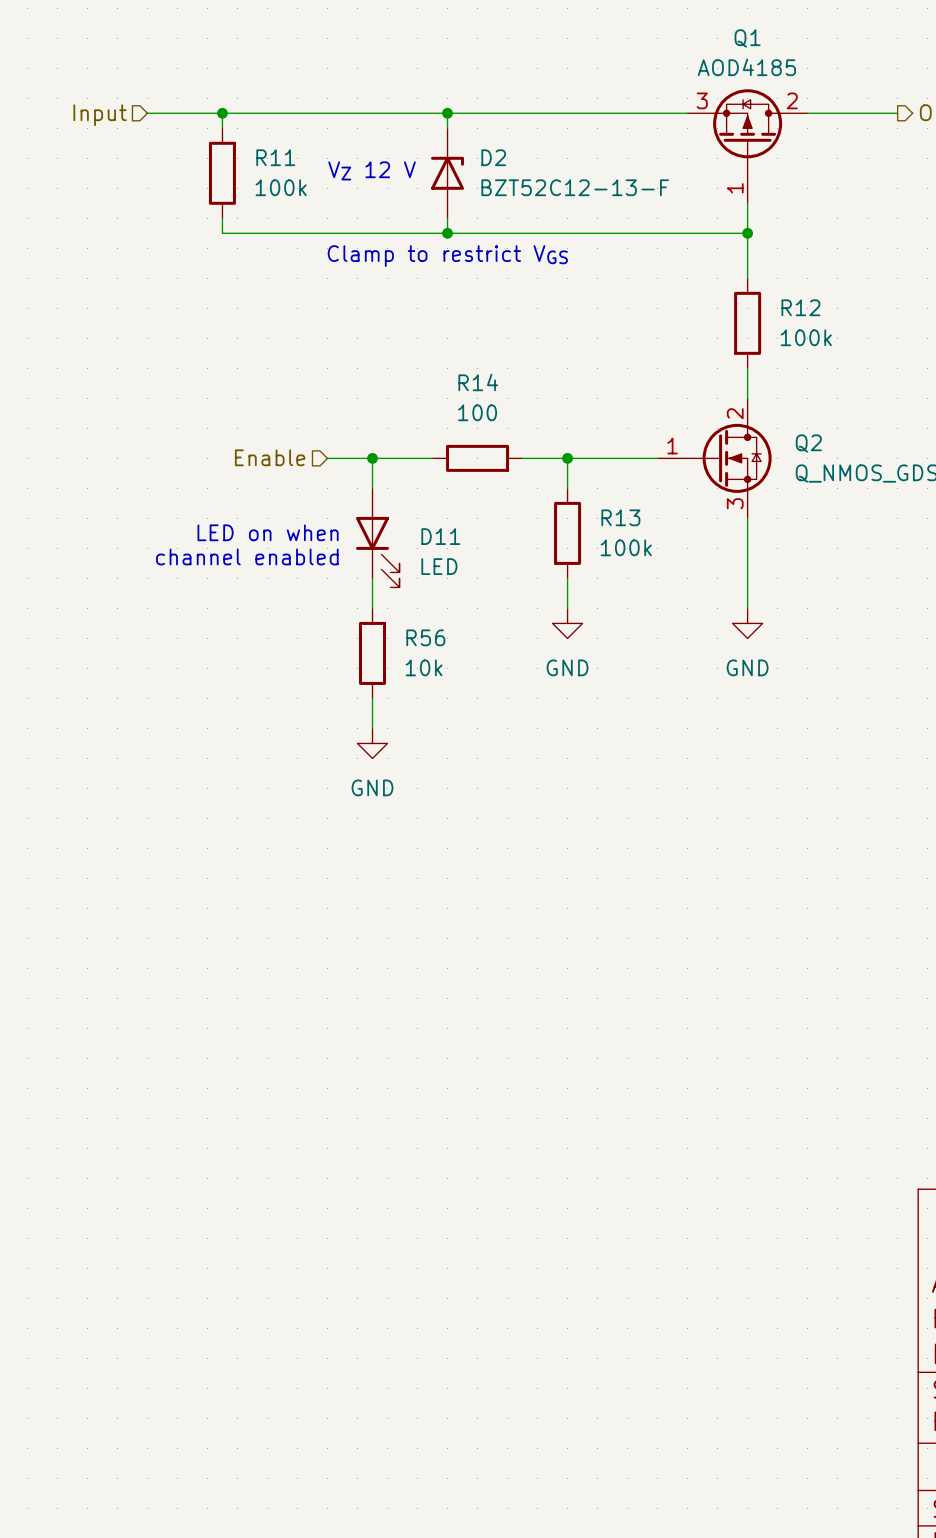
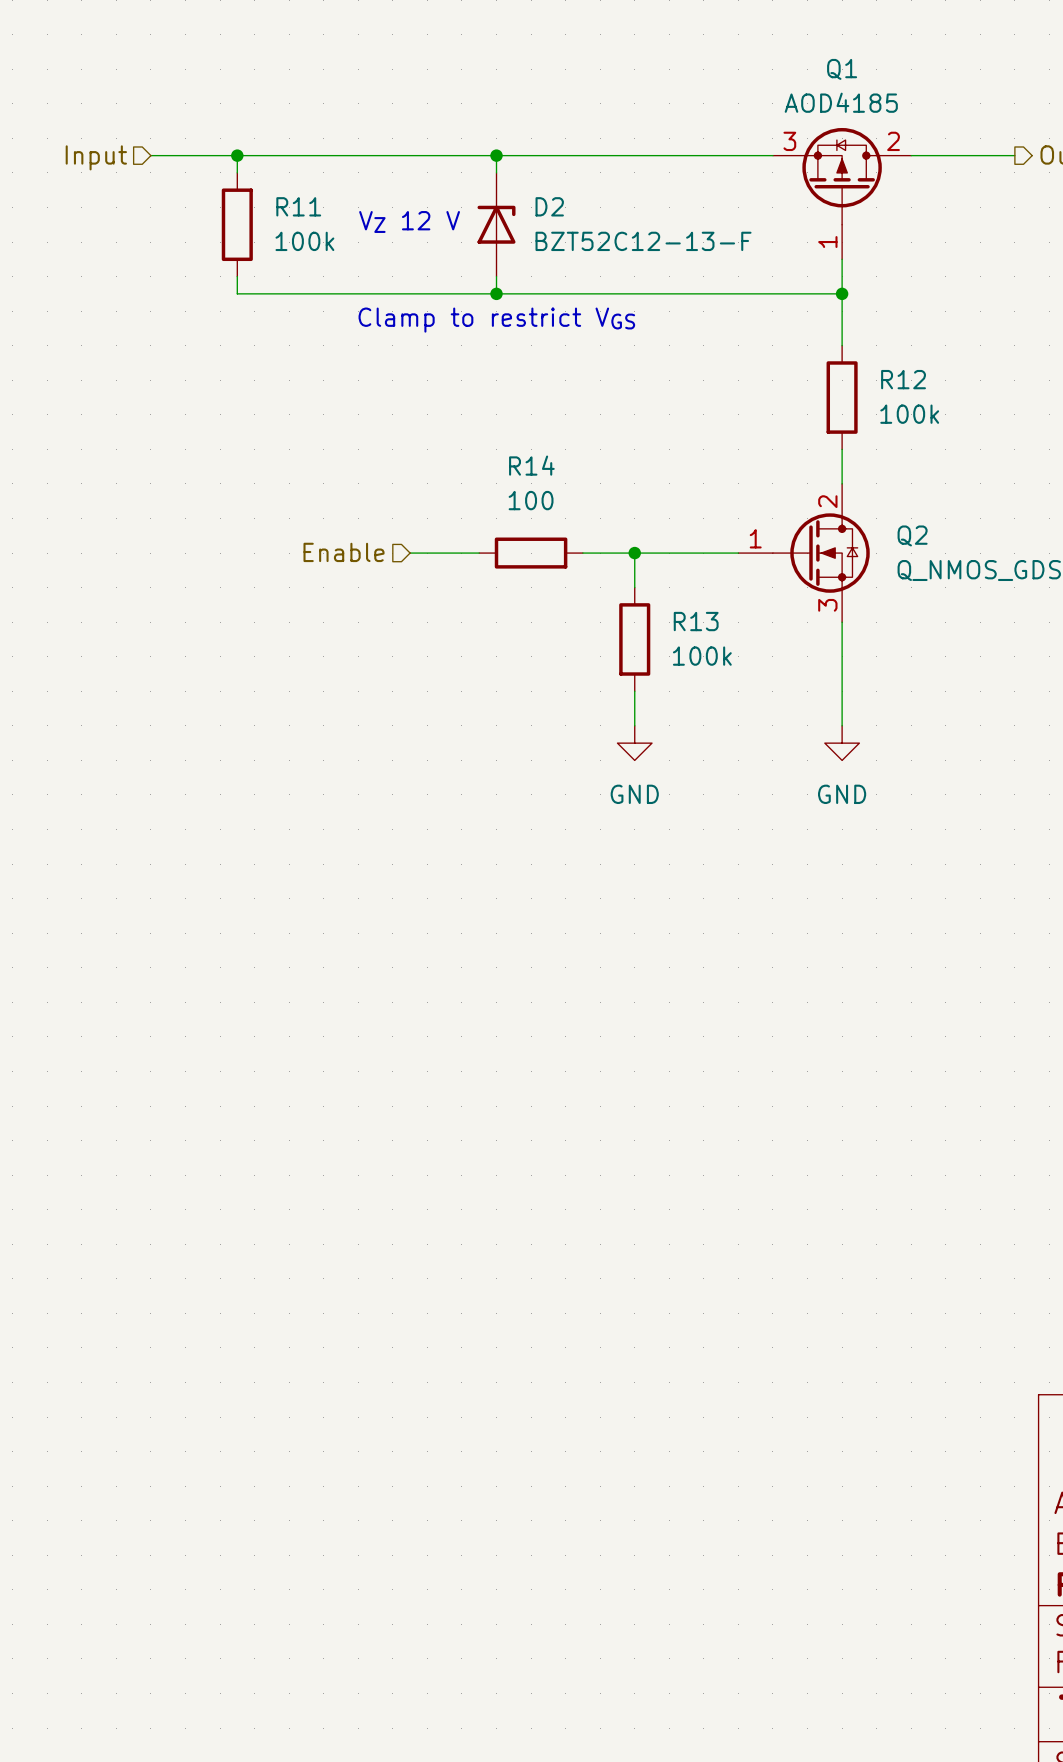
hierarchical label position: Enable (270, 457) -> Enable (344, 552)
wire: (327, 458) (372, 458) (372, 488) -> none
junction: (372, 458) -> none
text: LED on when (268, 532) -> none
D11: LED (377, 537) -> none
text: channel enabled (247, 556) -> none
wire: (372, 578) (372, 608) -> none
R56: 10k (372, 653) -> none
wire: (372, 698) (372, 728) -> none
power symbol: GND (372, 743) -> none

